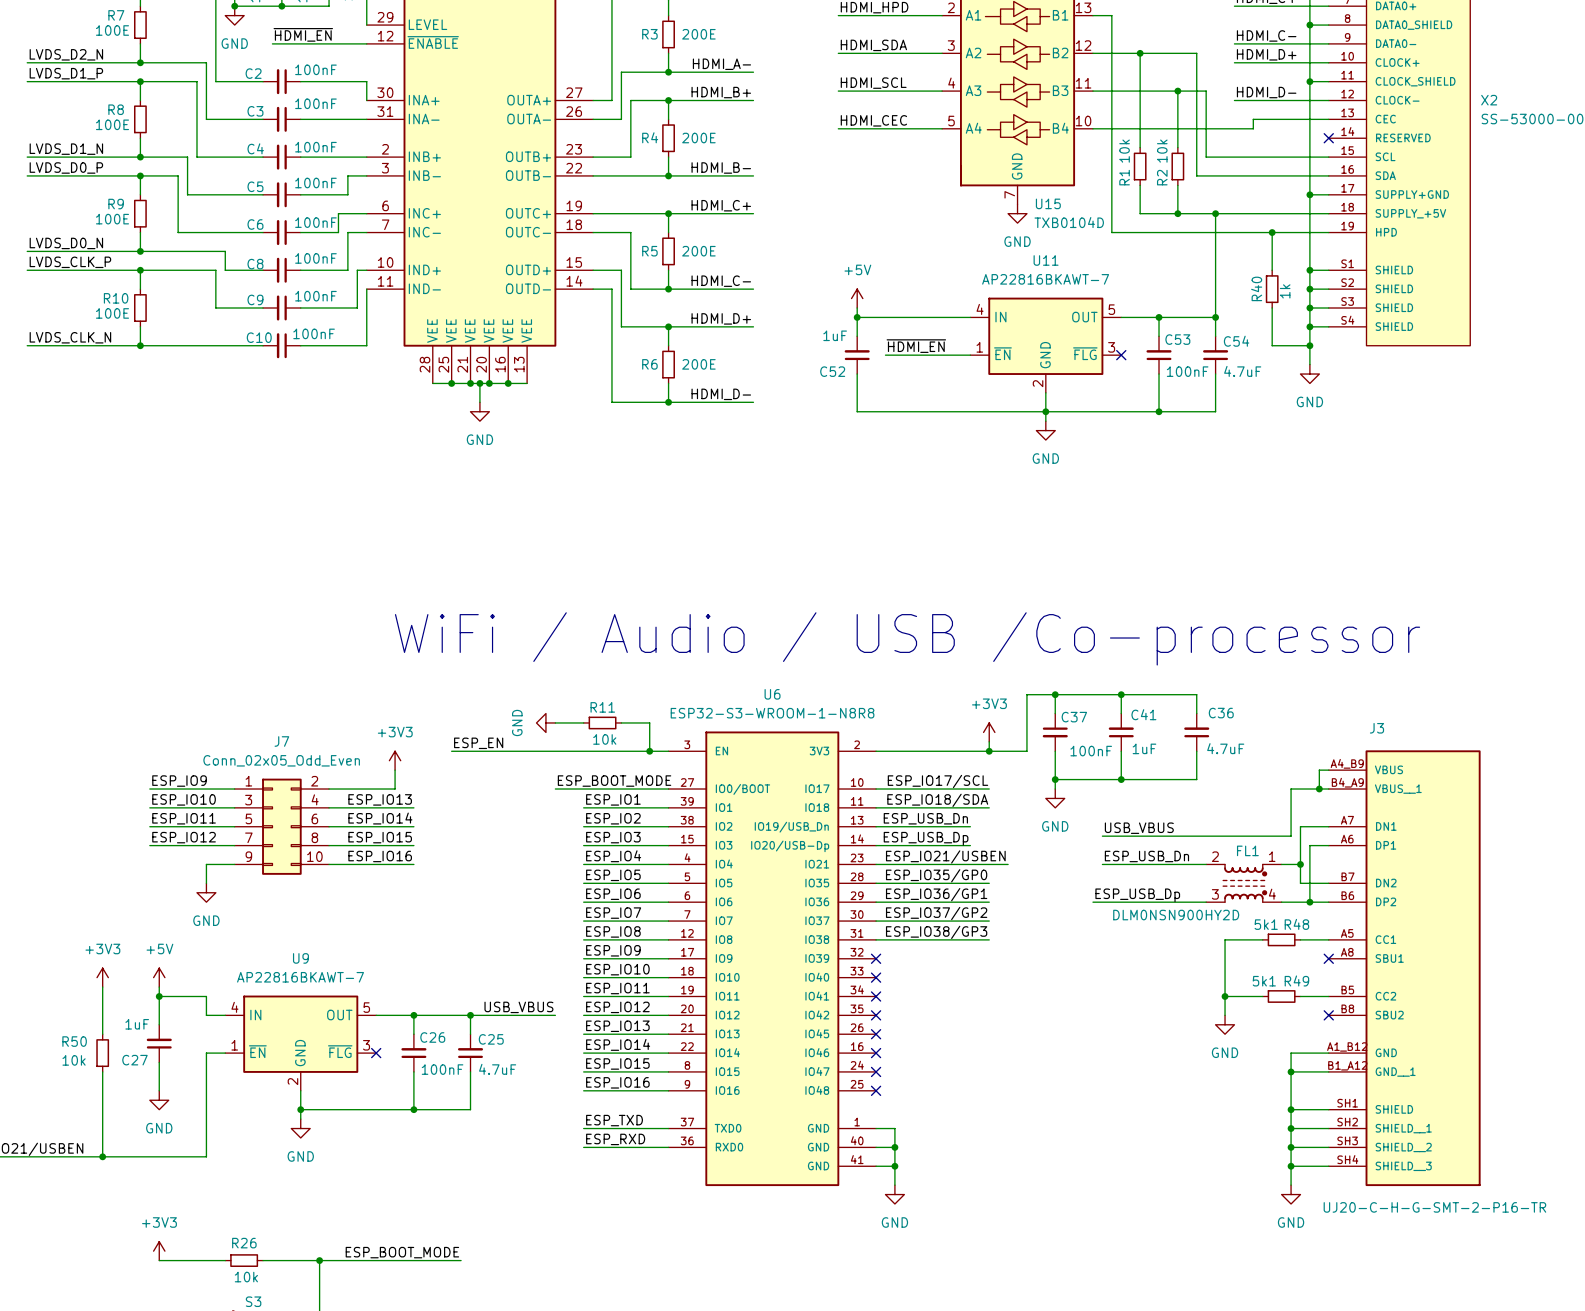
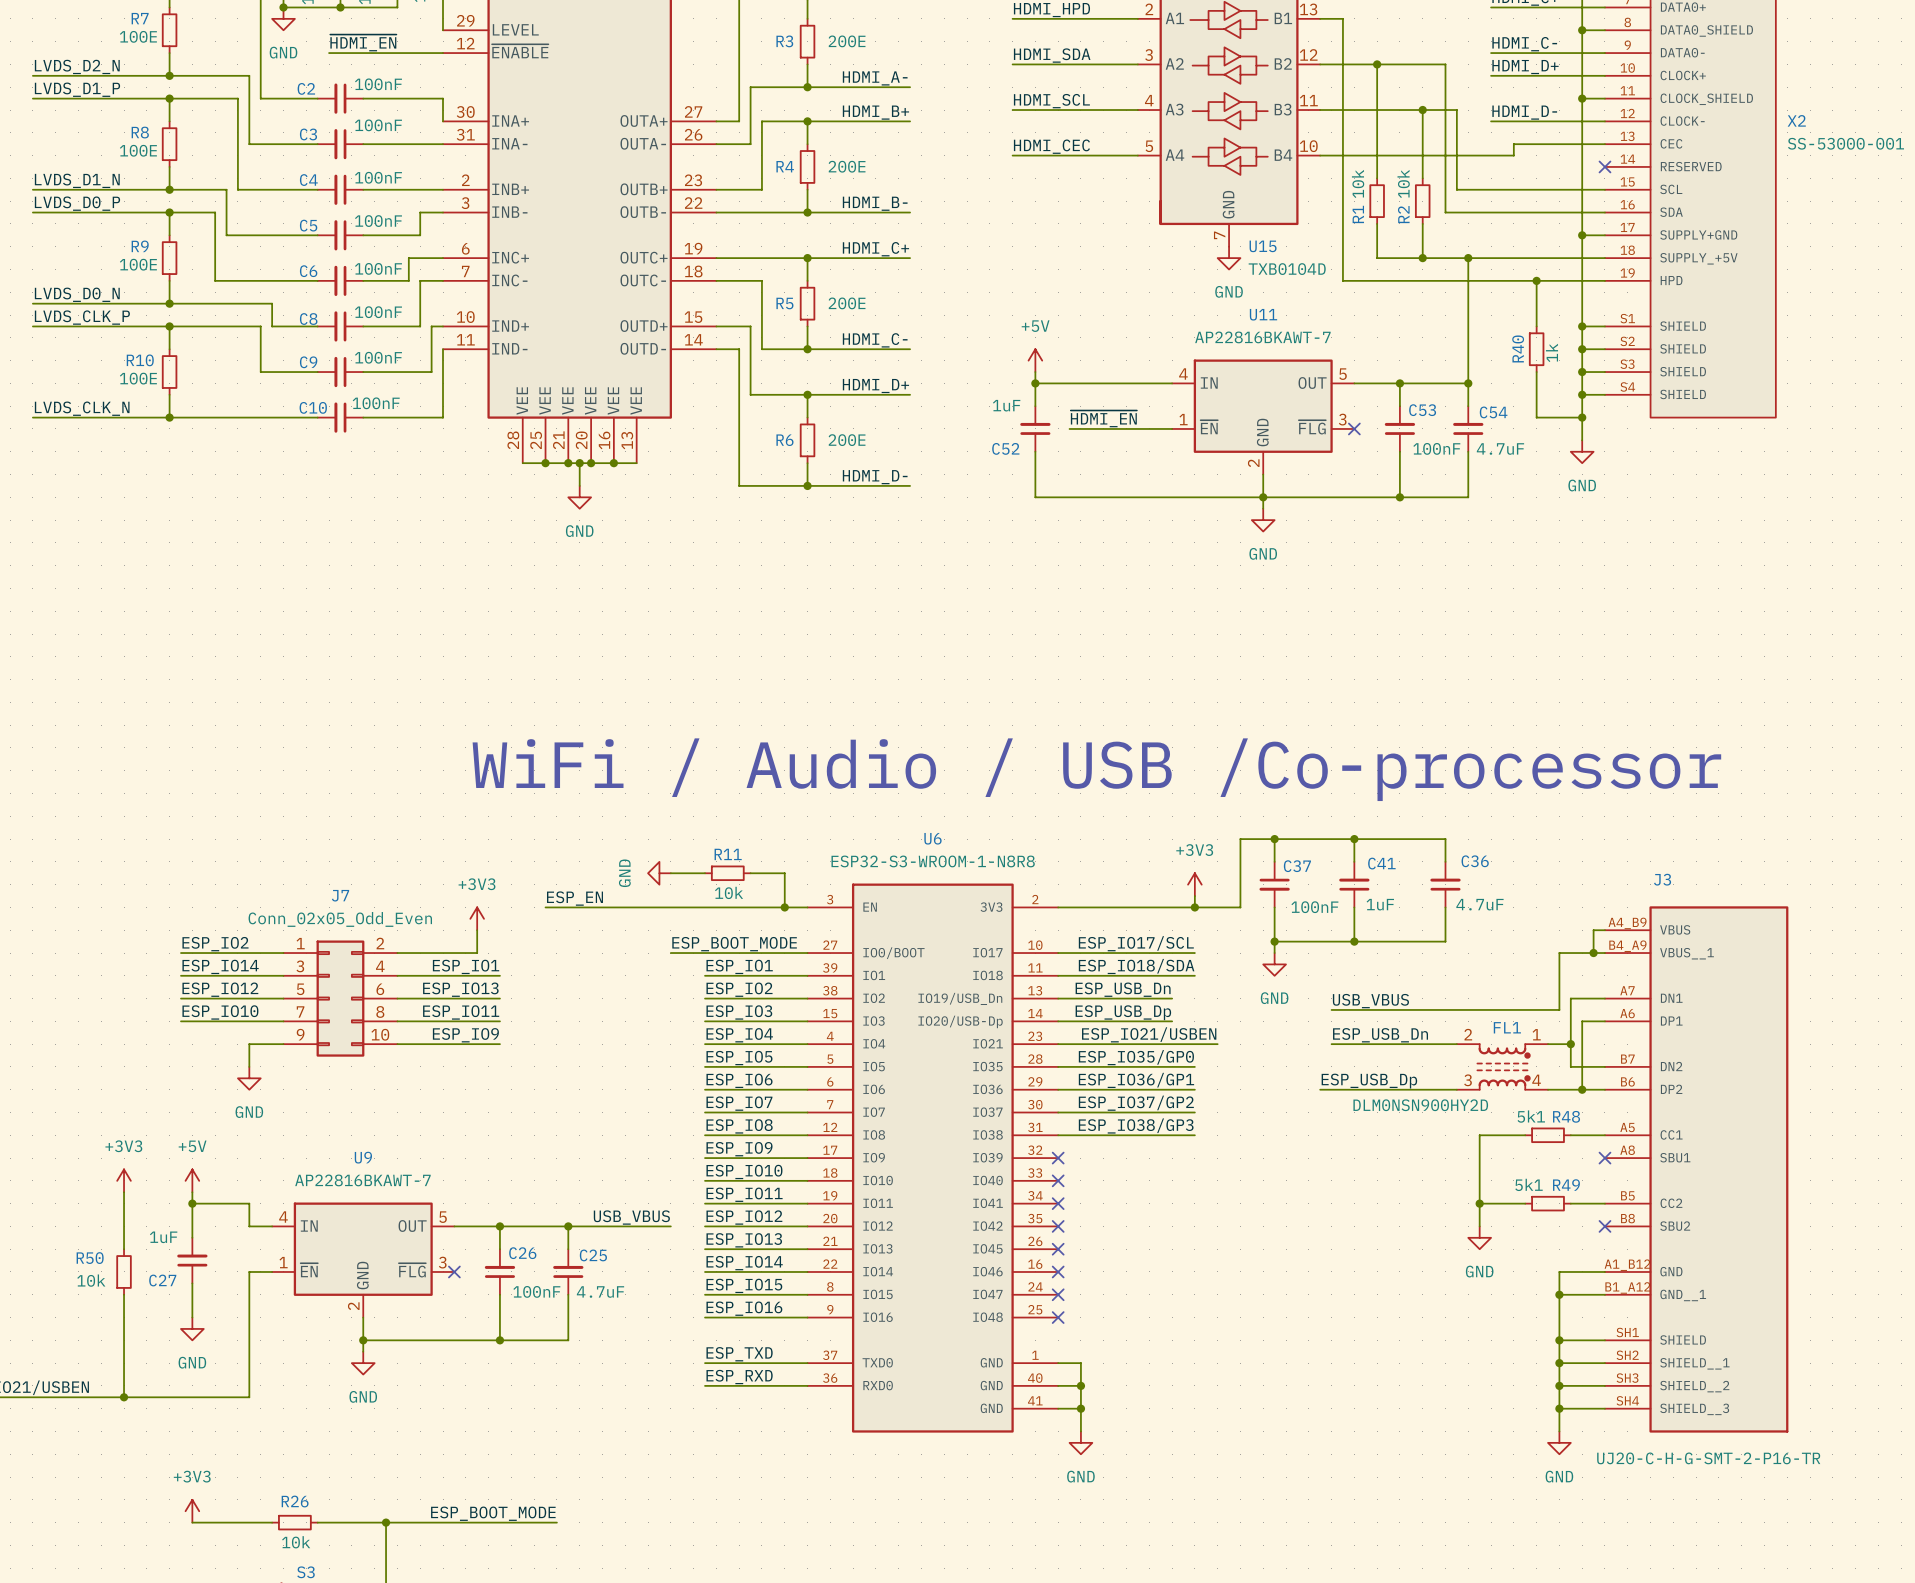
label: ESP_IO9 (179, 781) -> ESP_IO2 (215, 944)
label: ESP_IO10 (184, 799) -> ESP_IO14 (220, 966)
label: ESP_IO13 (380, 799) -> ESP_IO1 (466, 966)
label: ESP_IO11 (184, 818) -> ESP_IO12 (220, 989)
label: ESP_IO14 (380, 818) -> ESP_IO13 (460, 989)
label: ESP_IO12 (184, 837) -> ESP_IO10 (220, 1012)
label: ESP_IO15 (380, 837) -> ESP_IO11 (461, 1012)
label: ESP_IO16 (380, 856) -> ESP_IO9 (465, 1035)

